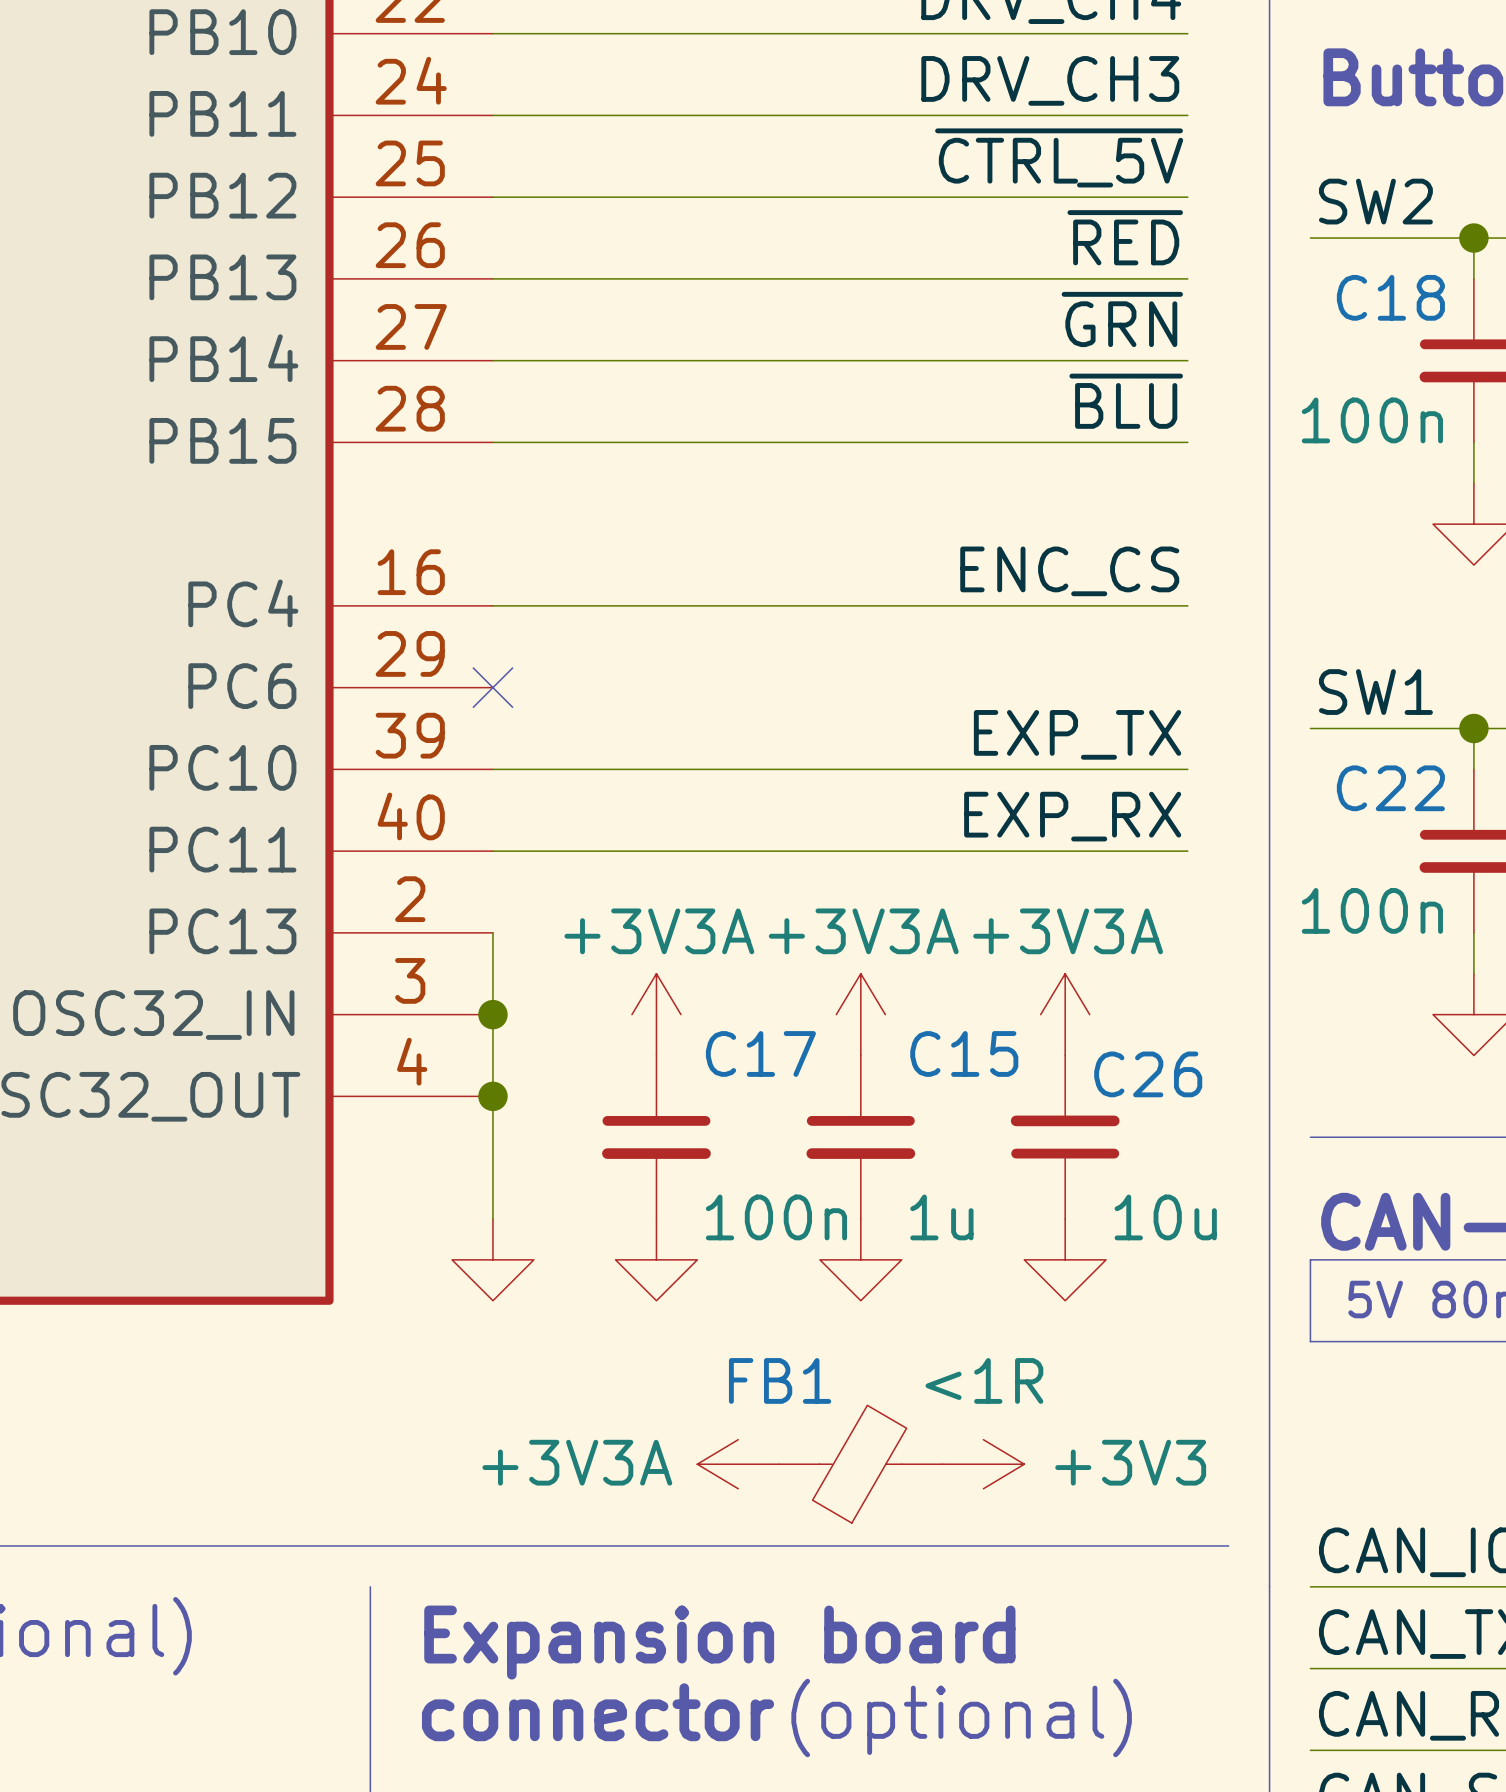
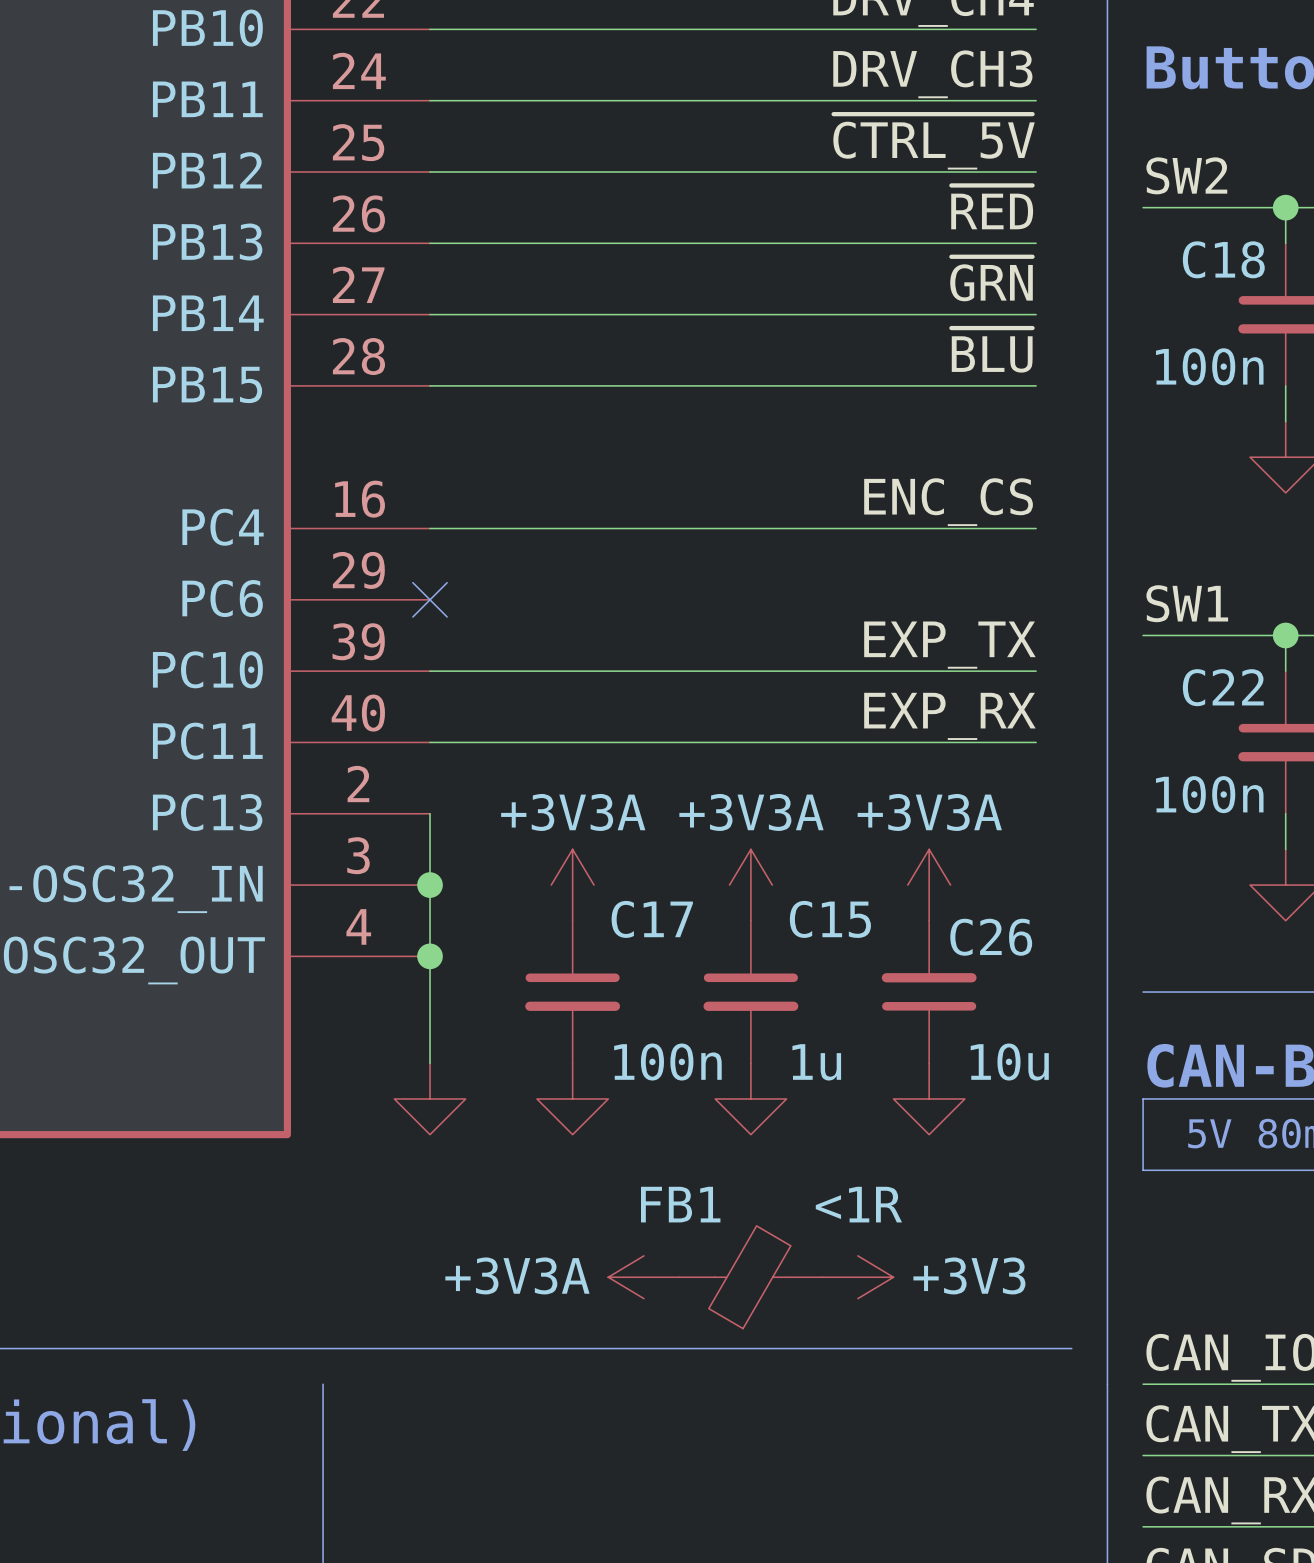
text: Expansion board (719, 1642) -> none
text: connector (598, 1712) -> none
text: (optional) (961, 1717) -> none

